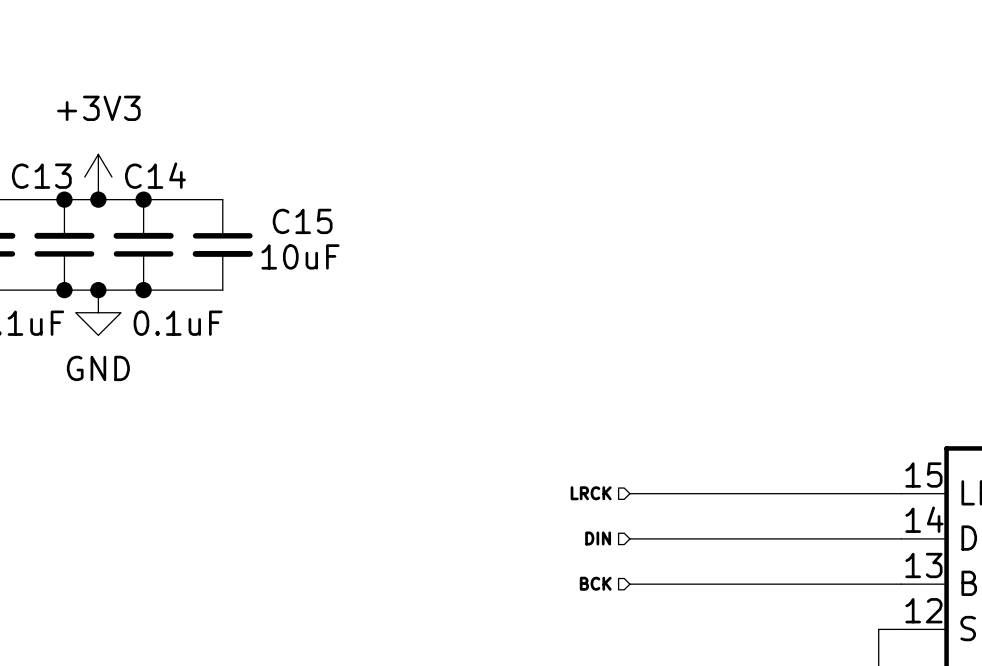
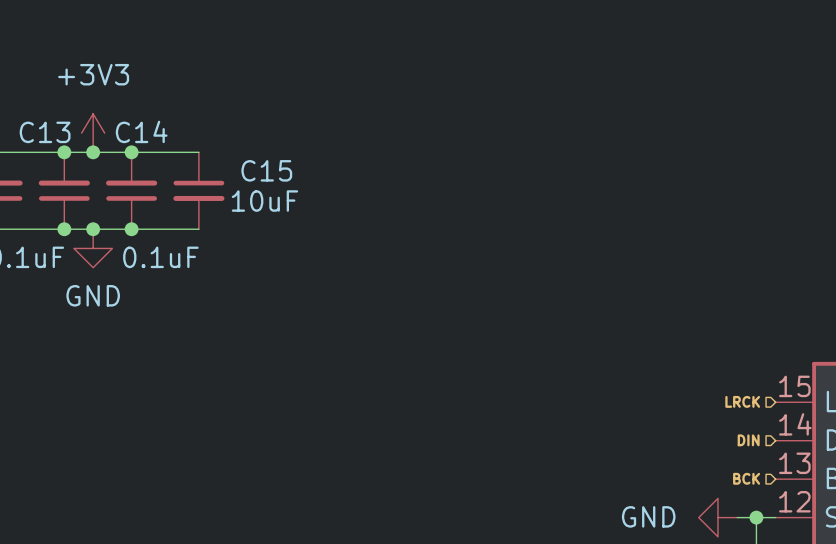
hierarchical label position: LRCK (591, 493) -> LRCK (742, 401)
wire: (629, 493) (901, 493) -> none
hierarchical label position: DIN (598, 538) -> DIN (748, 440)
wire: (629, 538) (901, 538) -> none
hierarchical label position: BCK (595, 583) -> BCK (746, 478)
wire: (629, 584) (901, 584) -> none
power symbol: none -> GND (717, 517)
wire: none -> (737, 517) (756, 517)
junction: none -> (756, 517)

